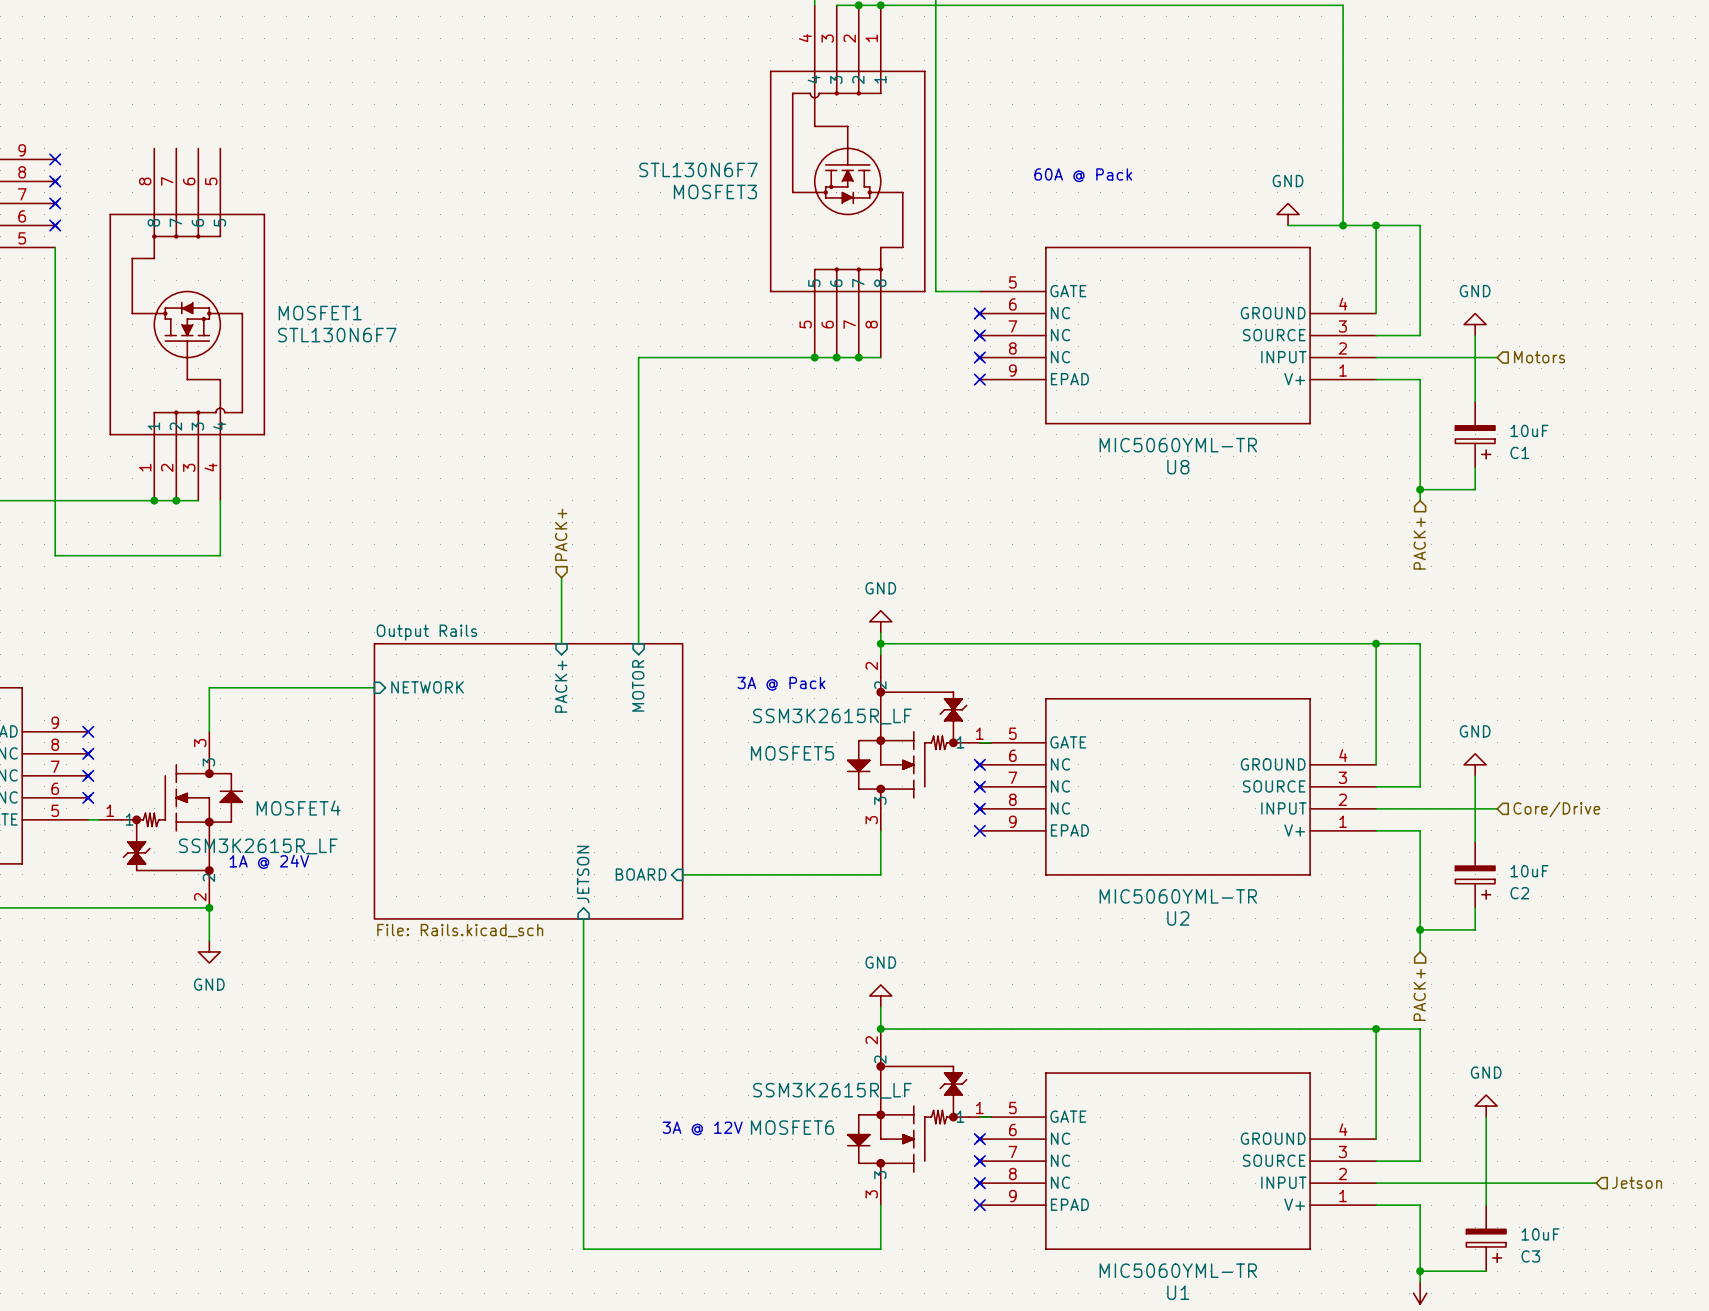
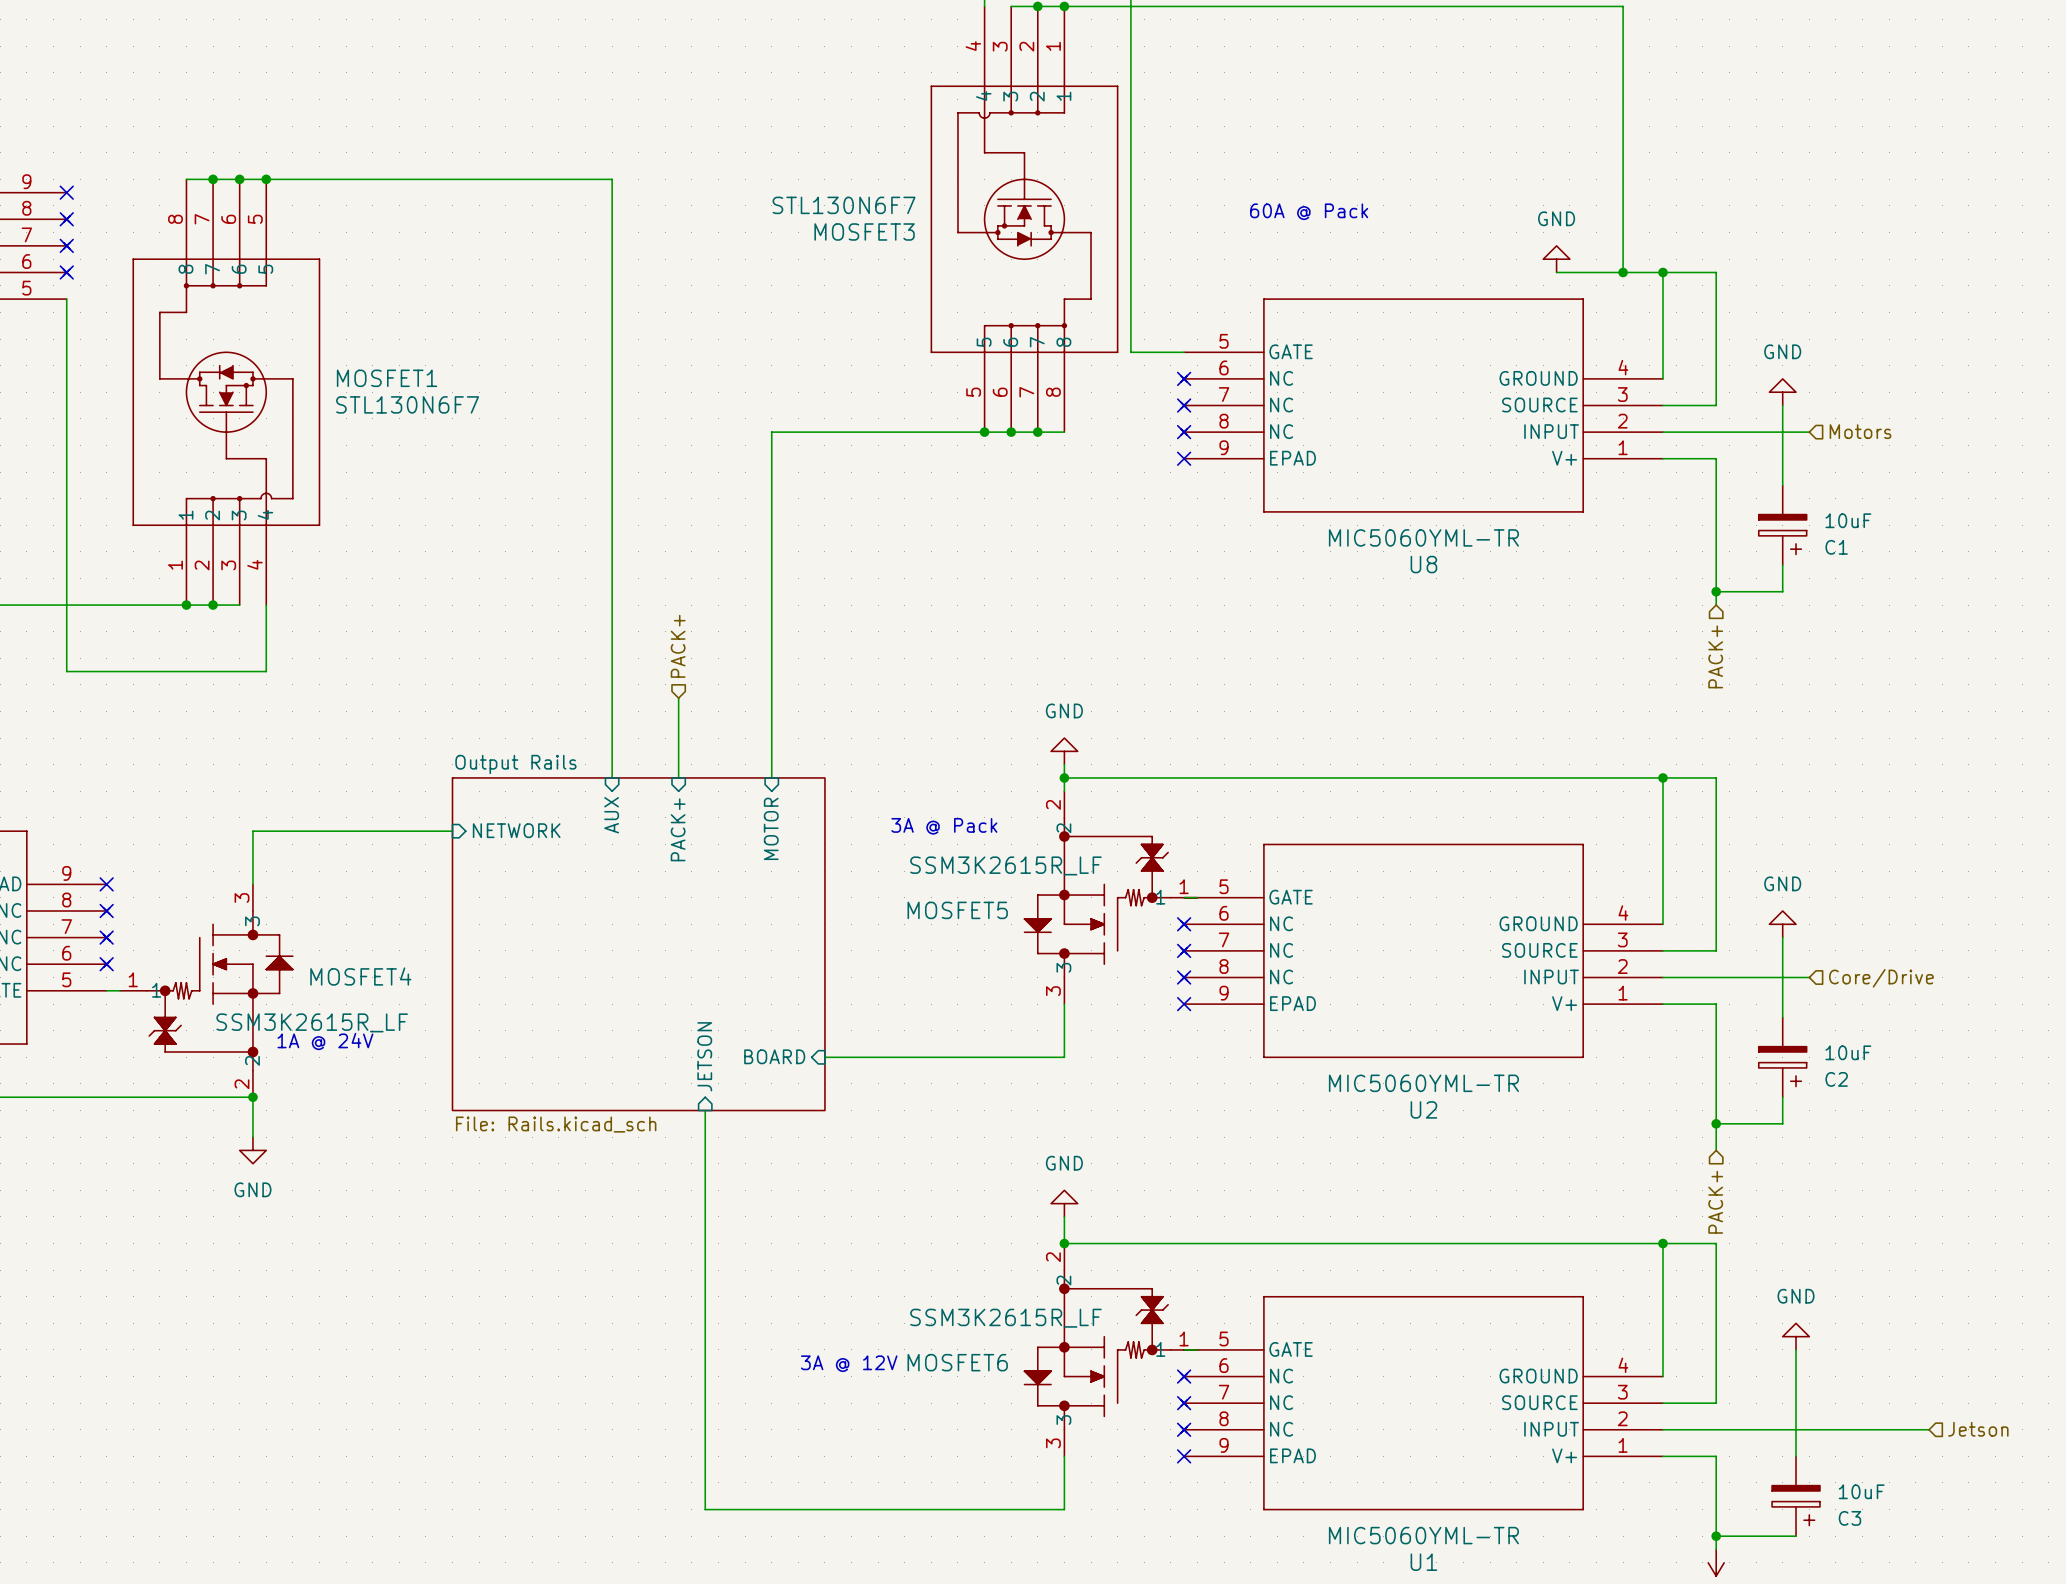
wire: none -> (186, 179) (612, 179) (612, 777)
junction: none -> (213, 179)
junction: none -> (239, 179)
junction: none -> (266, 179)
sheet pin: none -> AUX (611, 815)

